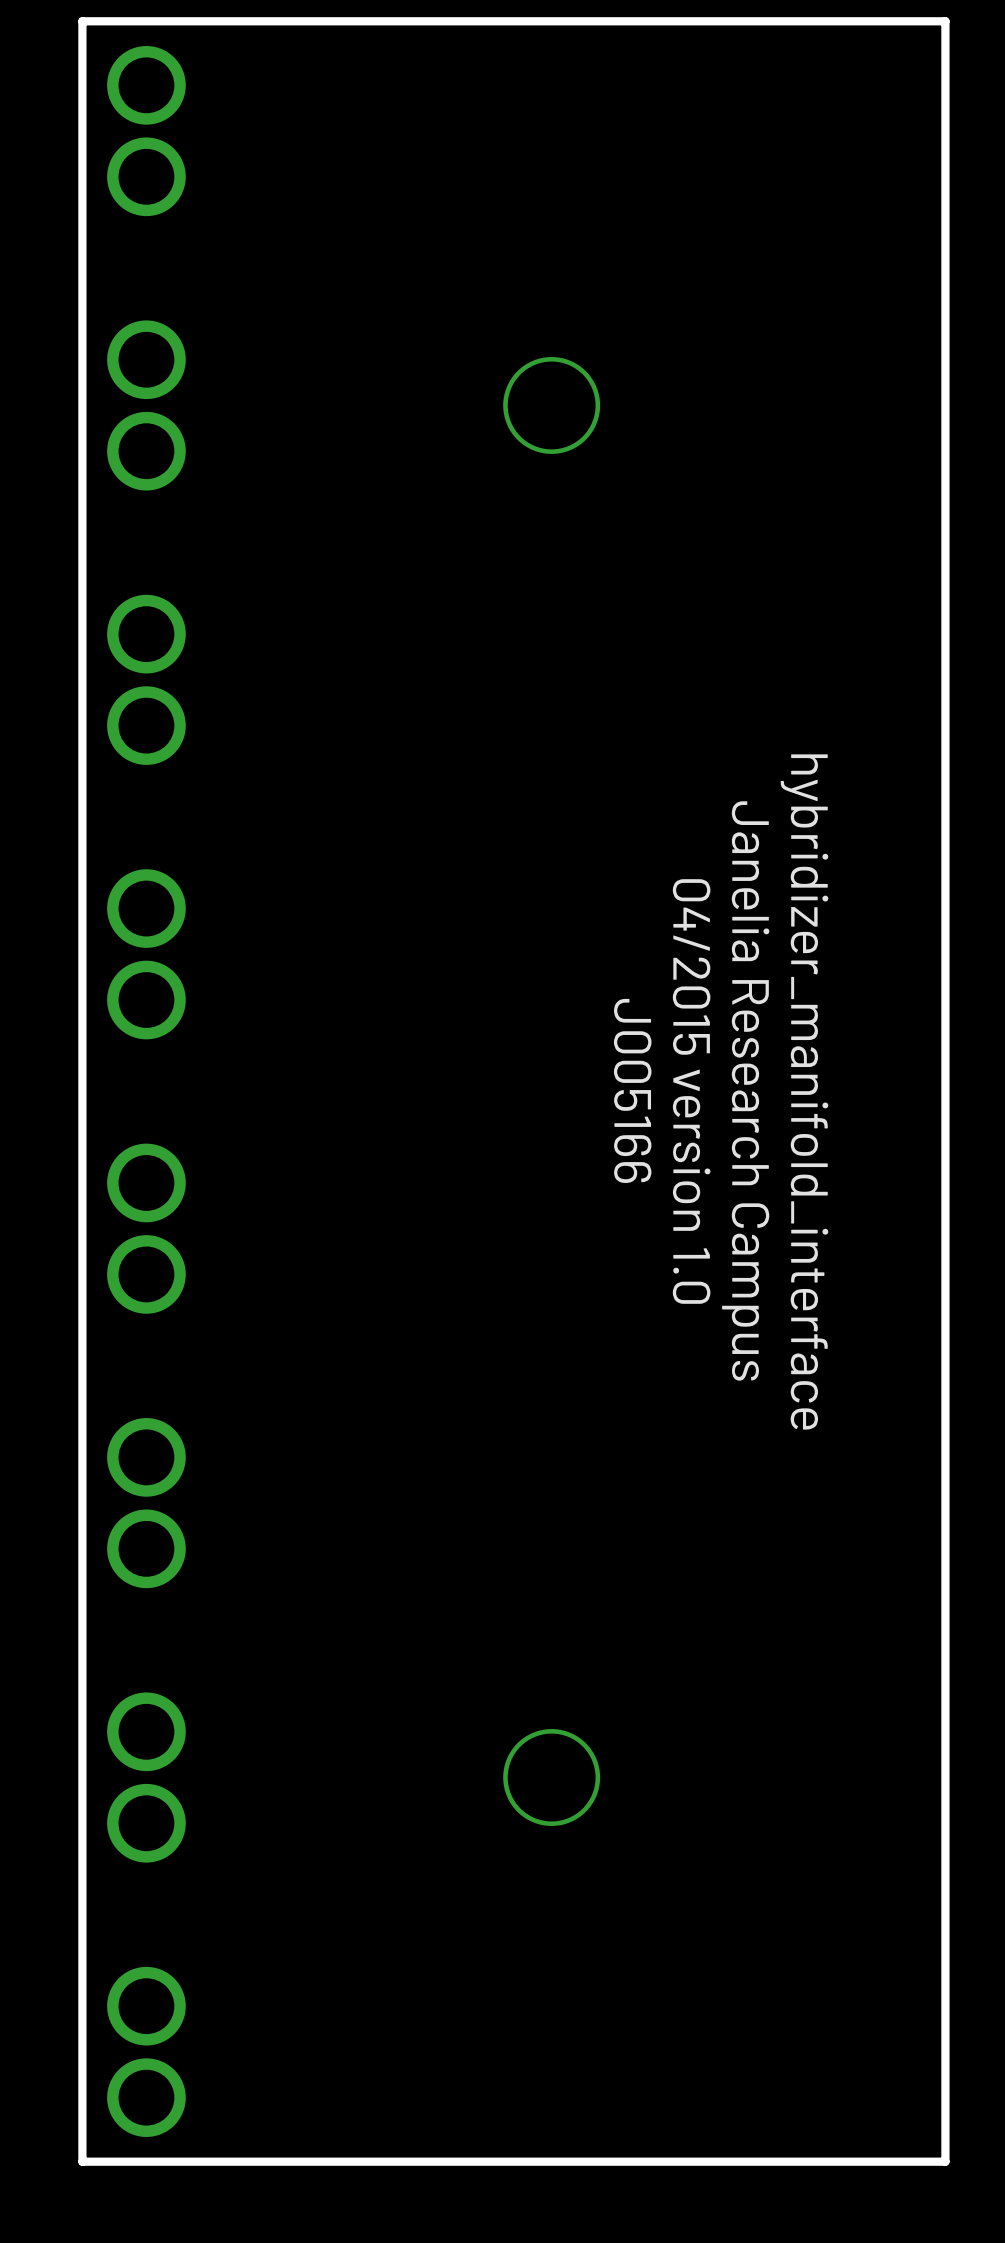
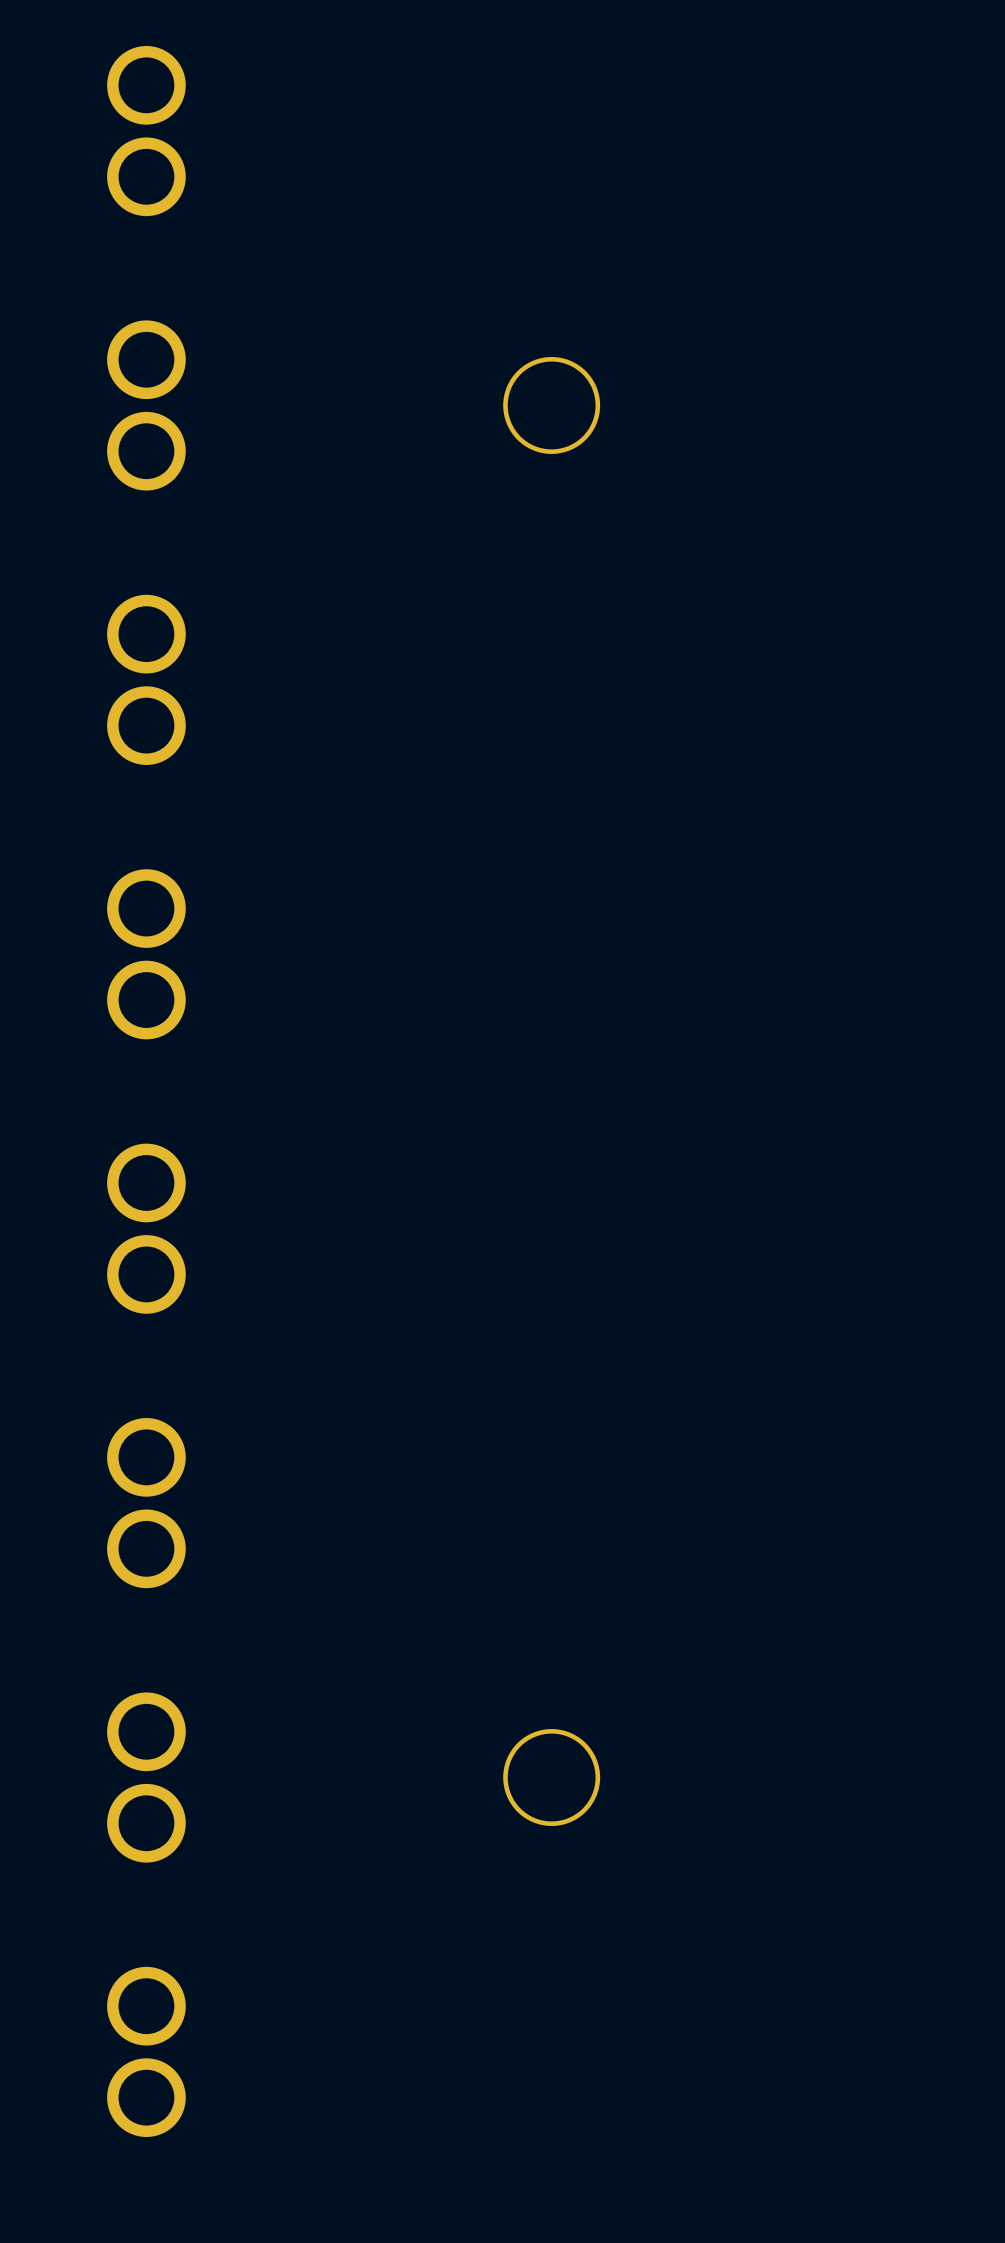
board edge: (945, 21) (945, 2161) (82, 2161) (82, 21) (945, 21) -> none
text: J005166 (632, 1090) -> none
text: Janelia Research Campus (745, 1090) -> none
text: 04/2015 version 1.0 (691, 1091) -> none
text: hybridizer_manifold_interface (804, 1091) -> none

